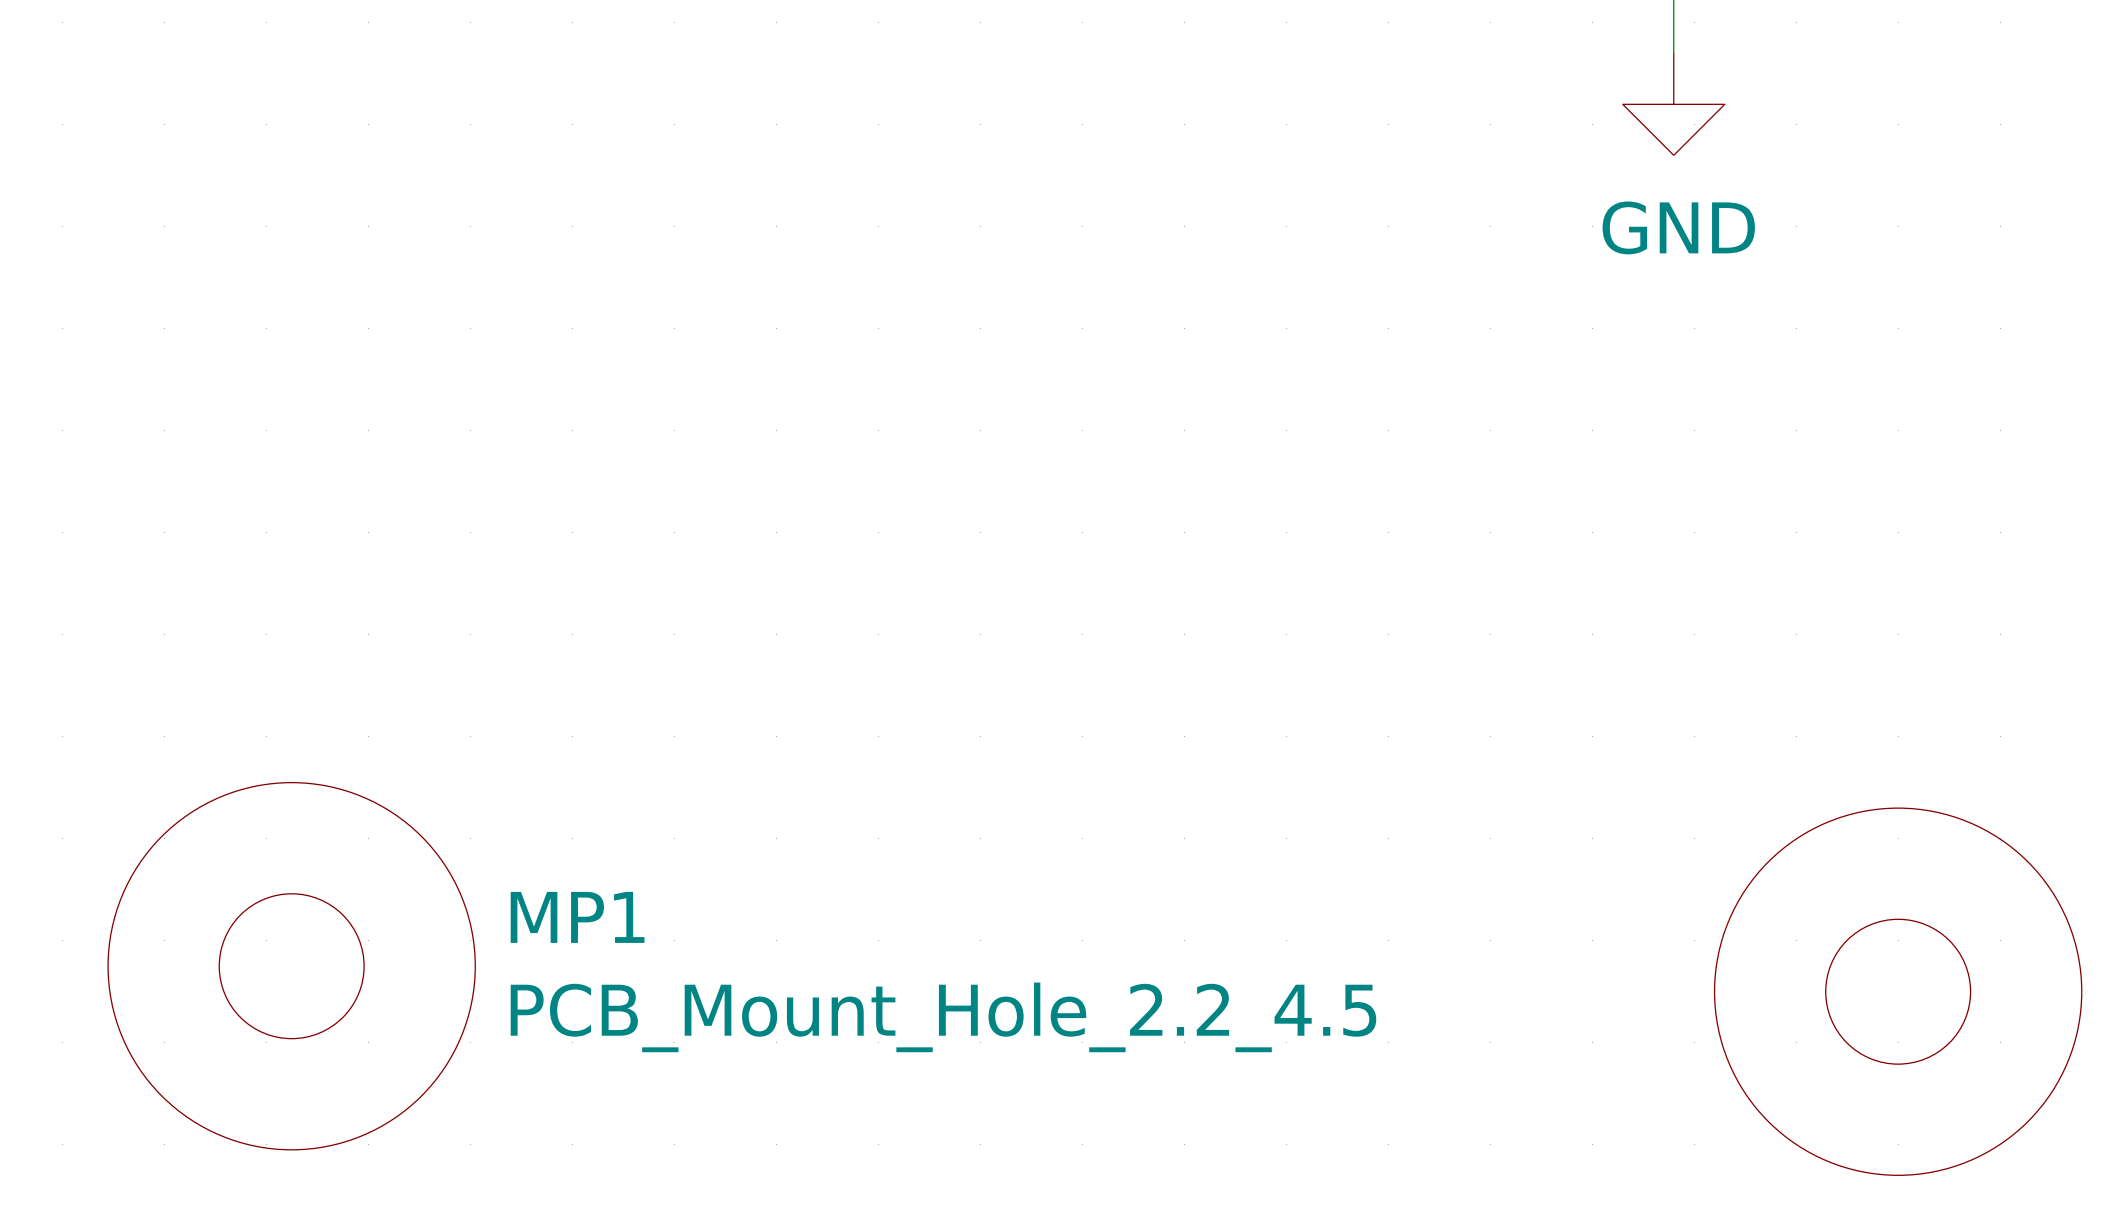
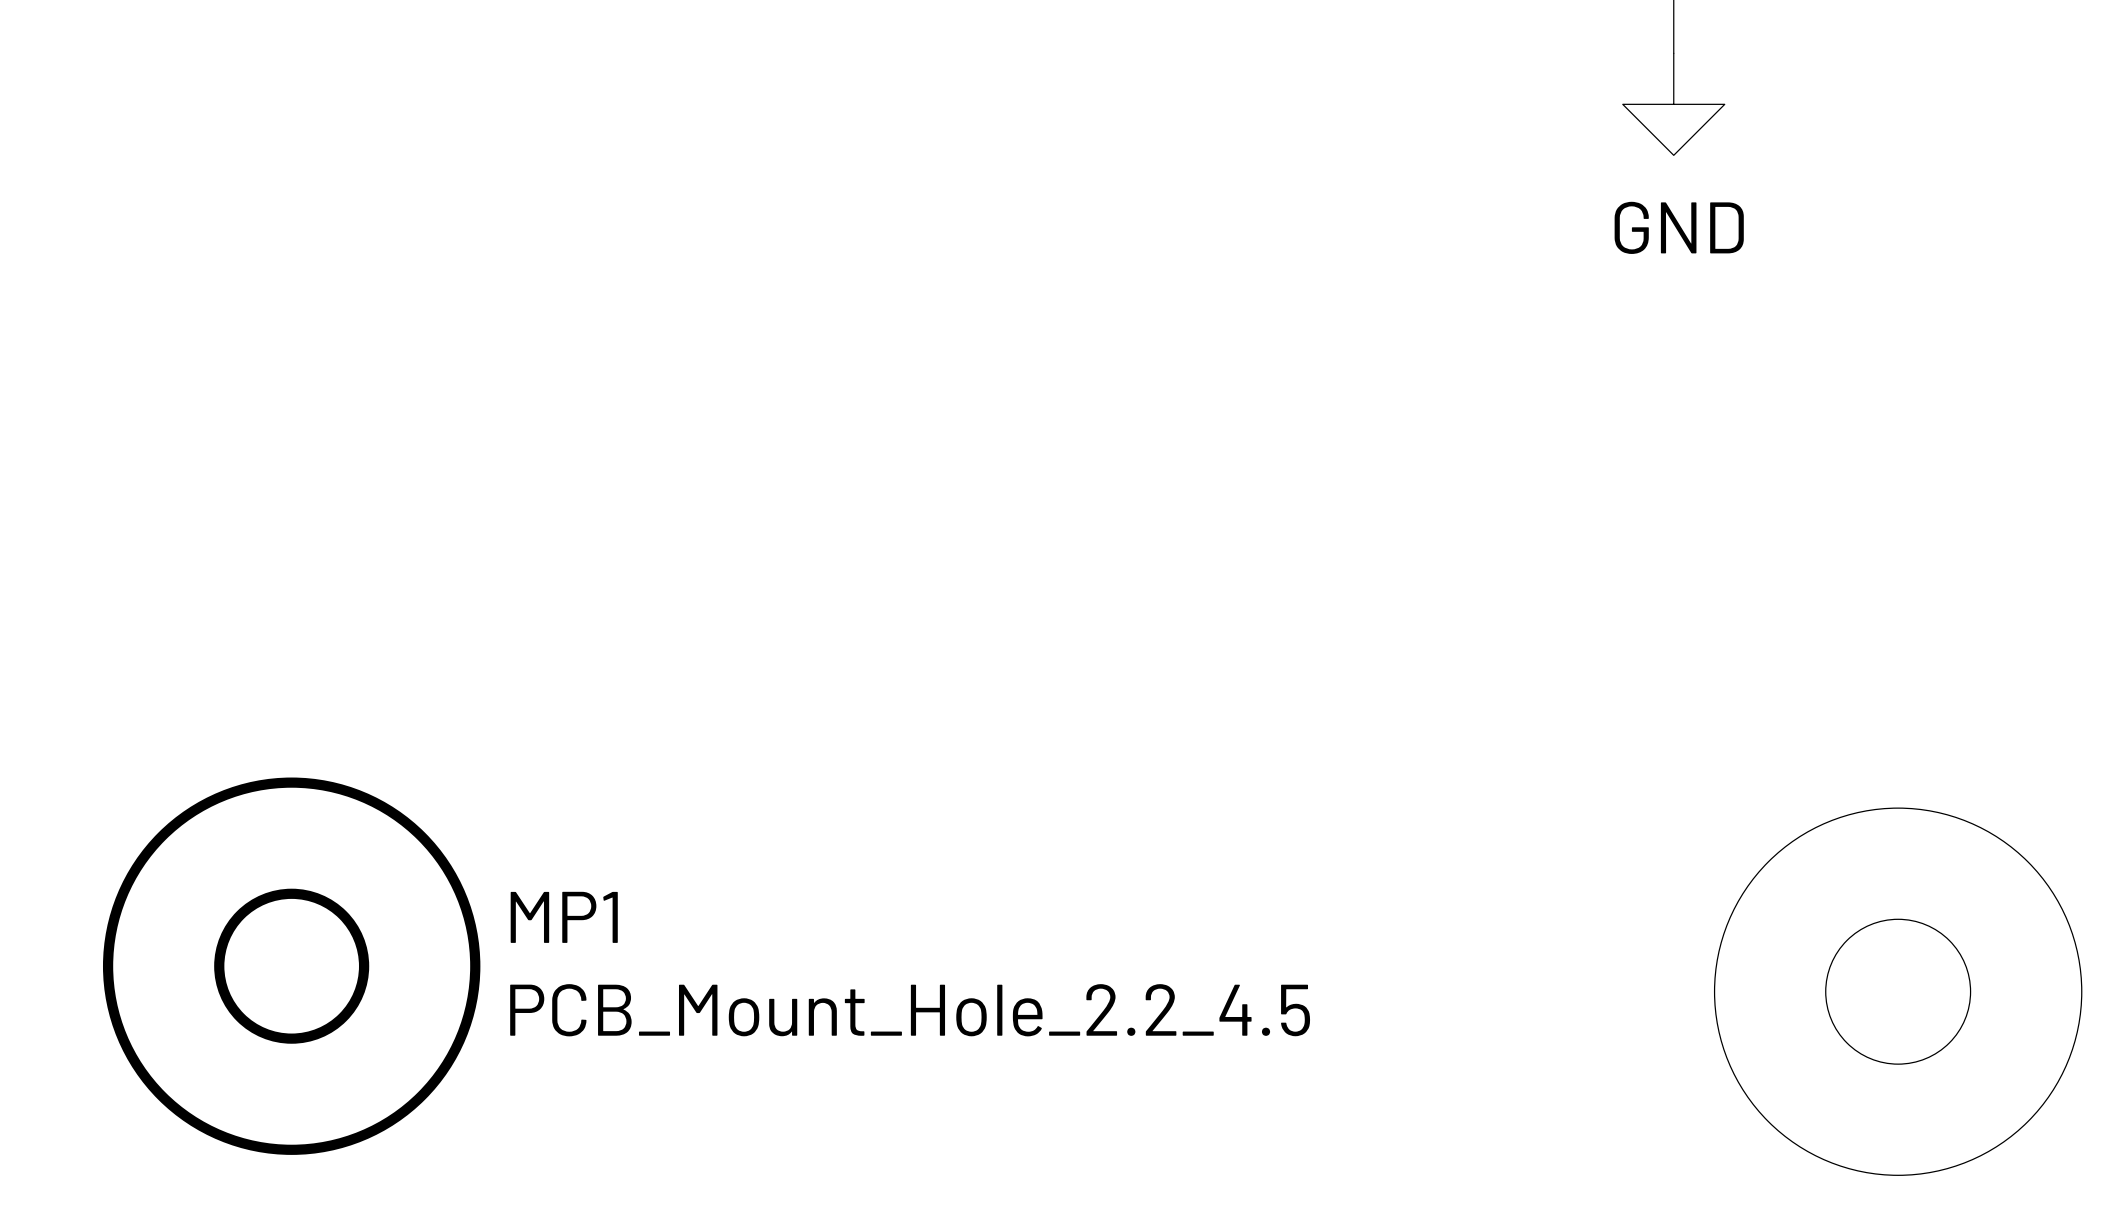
MP1 symbol: [108, 782, 476, 1150] -> [102, 777, 481, 1155]

